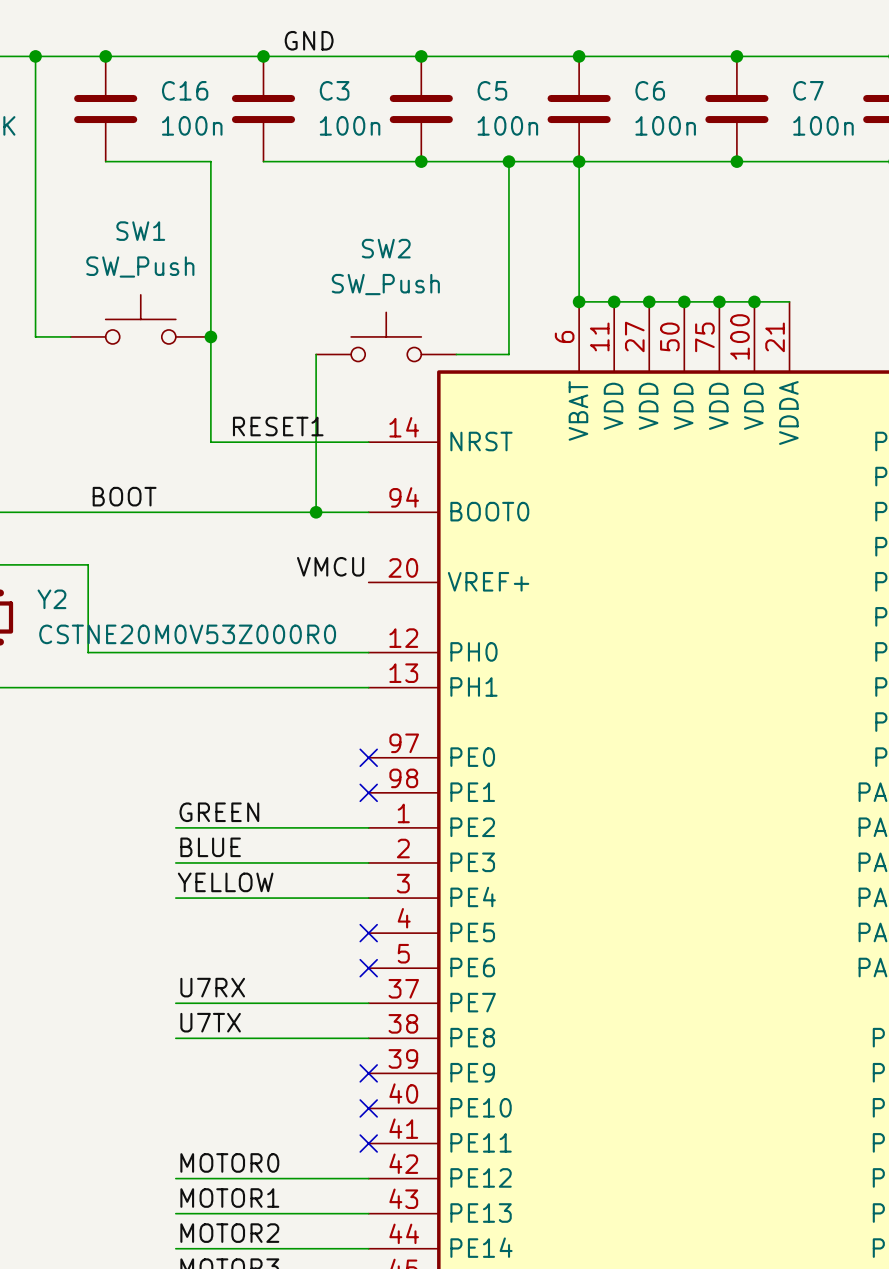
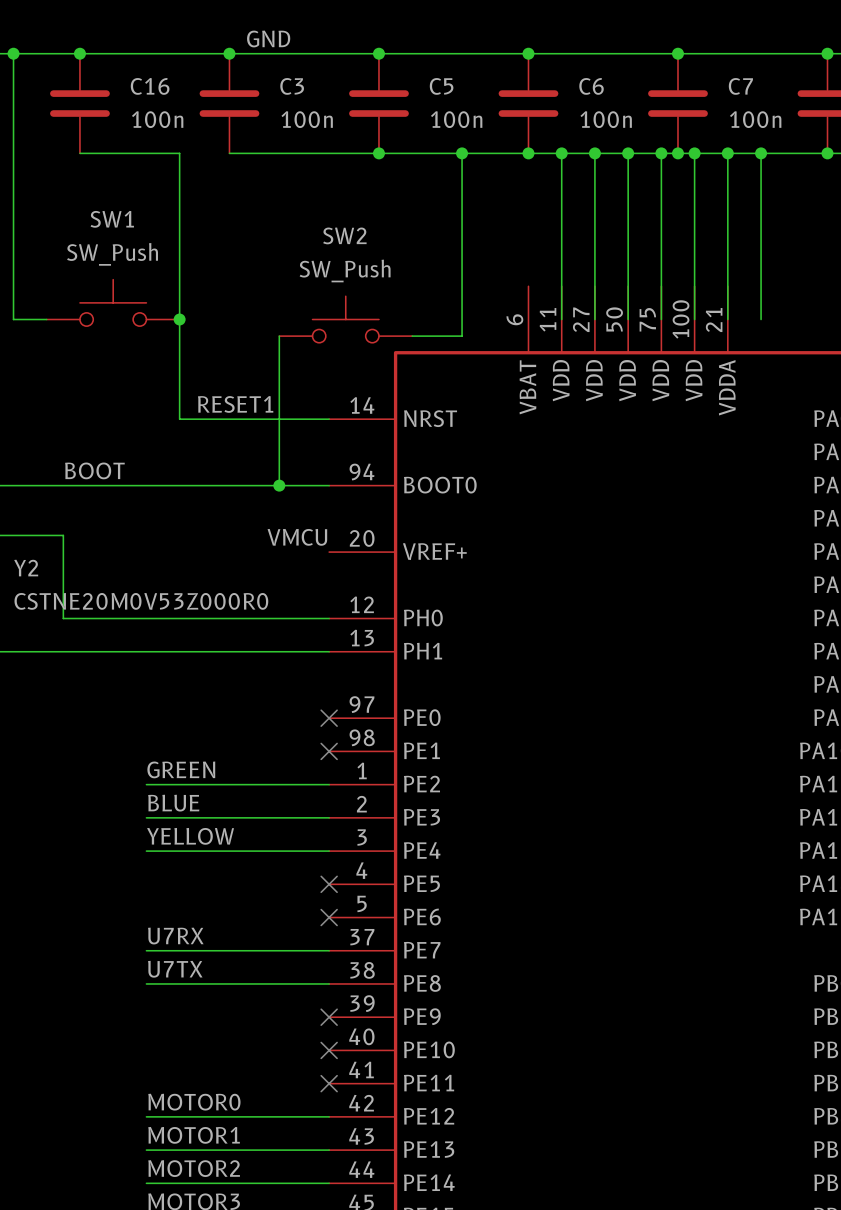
wire: (579, 161) (579, 301) (789, 301) -> none
wire: none -> (561, 153) (561, 319)
junction: none -> (561, 153)
wire: none -> (594, 153) (594, 319)
junction: none -> (594, 153)
wire: none -> (628, 153) (628, 319)
junction: none -> (628, 153)
wire: none -> (661, 153) (661, 319)
junction: none -> (661, 153)
wire: none -> (694, 153) (694, 319)
junction: none -> (694, 153)
wire: none -> (727, 153) (727, 319)
junction: none -> (727, 153)
wire: none -> (761, 153) (761, 319)
junction: none -> (761, 153)
junction: (579, 301) -> none
junction: (614, 301) -> none
junction: (649, 301) -> none
junction: (684, 301) -> none
junction: (719, 301) -> none
junction: (754, 301) -> none

